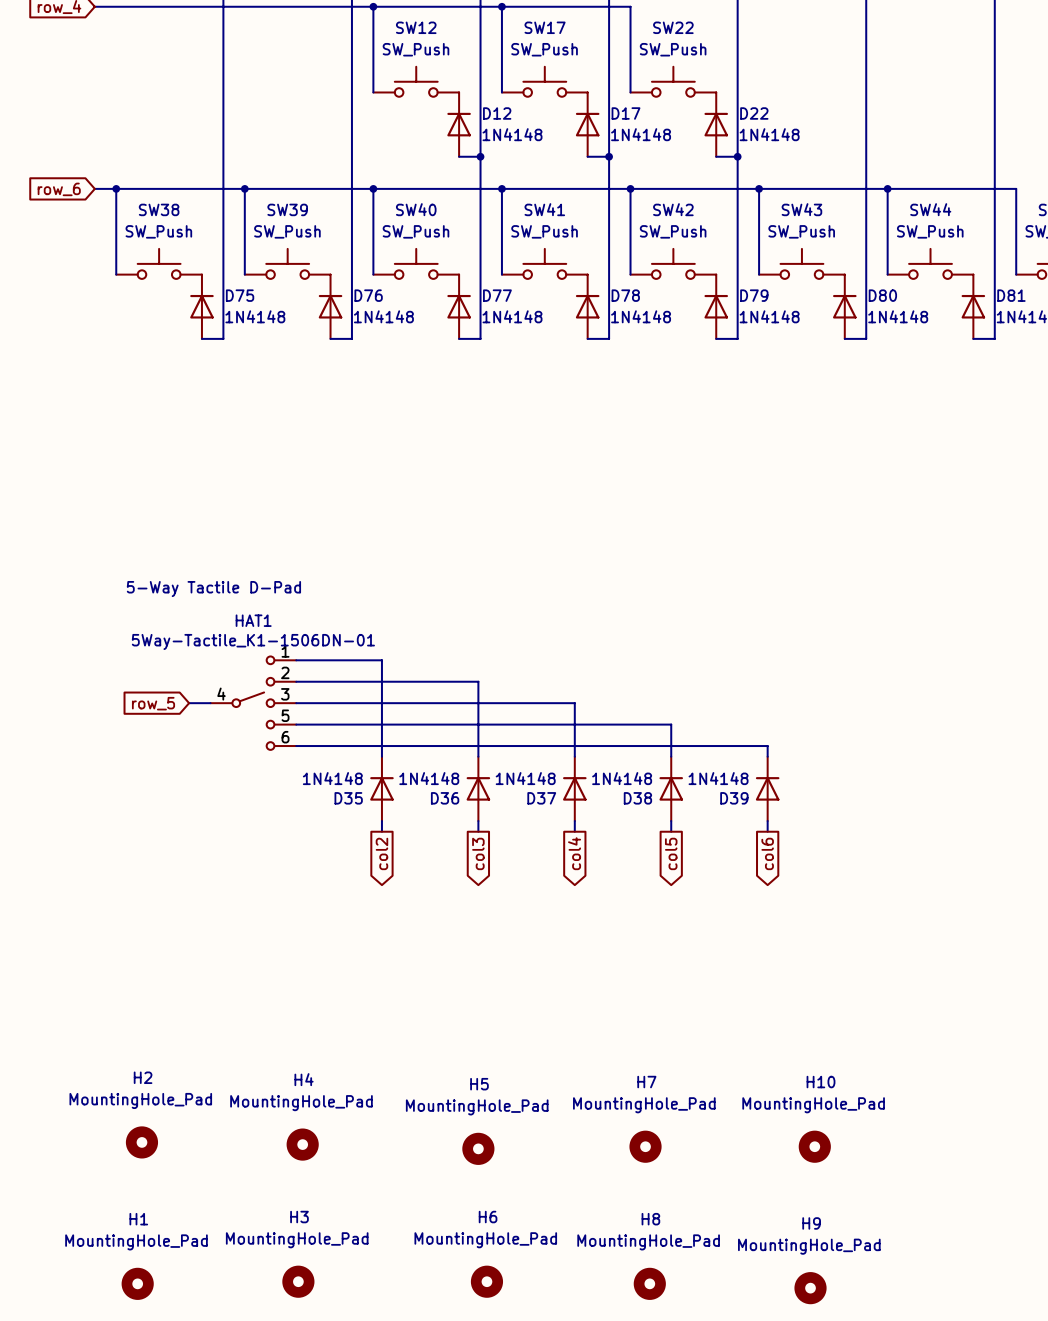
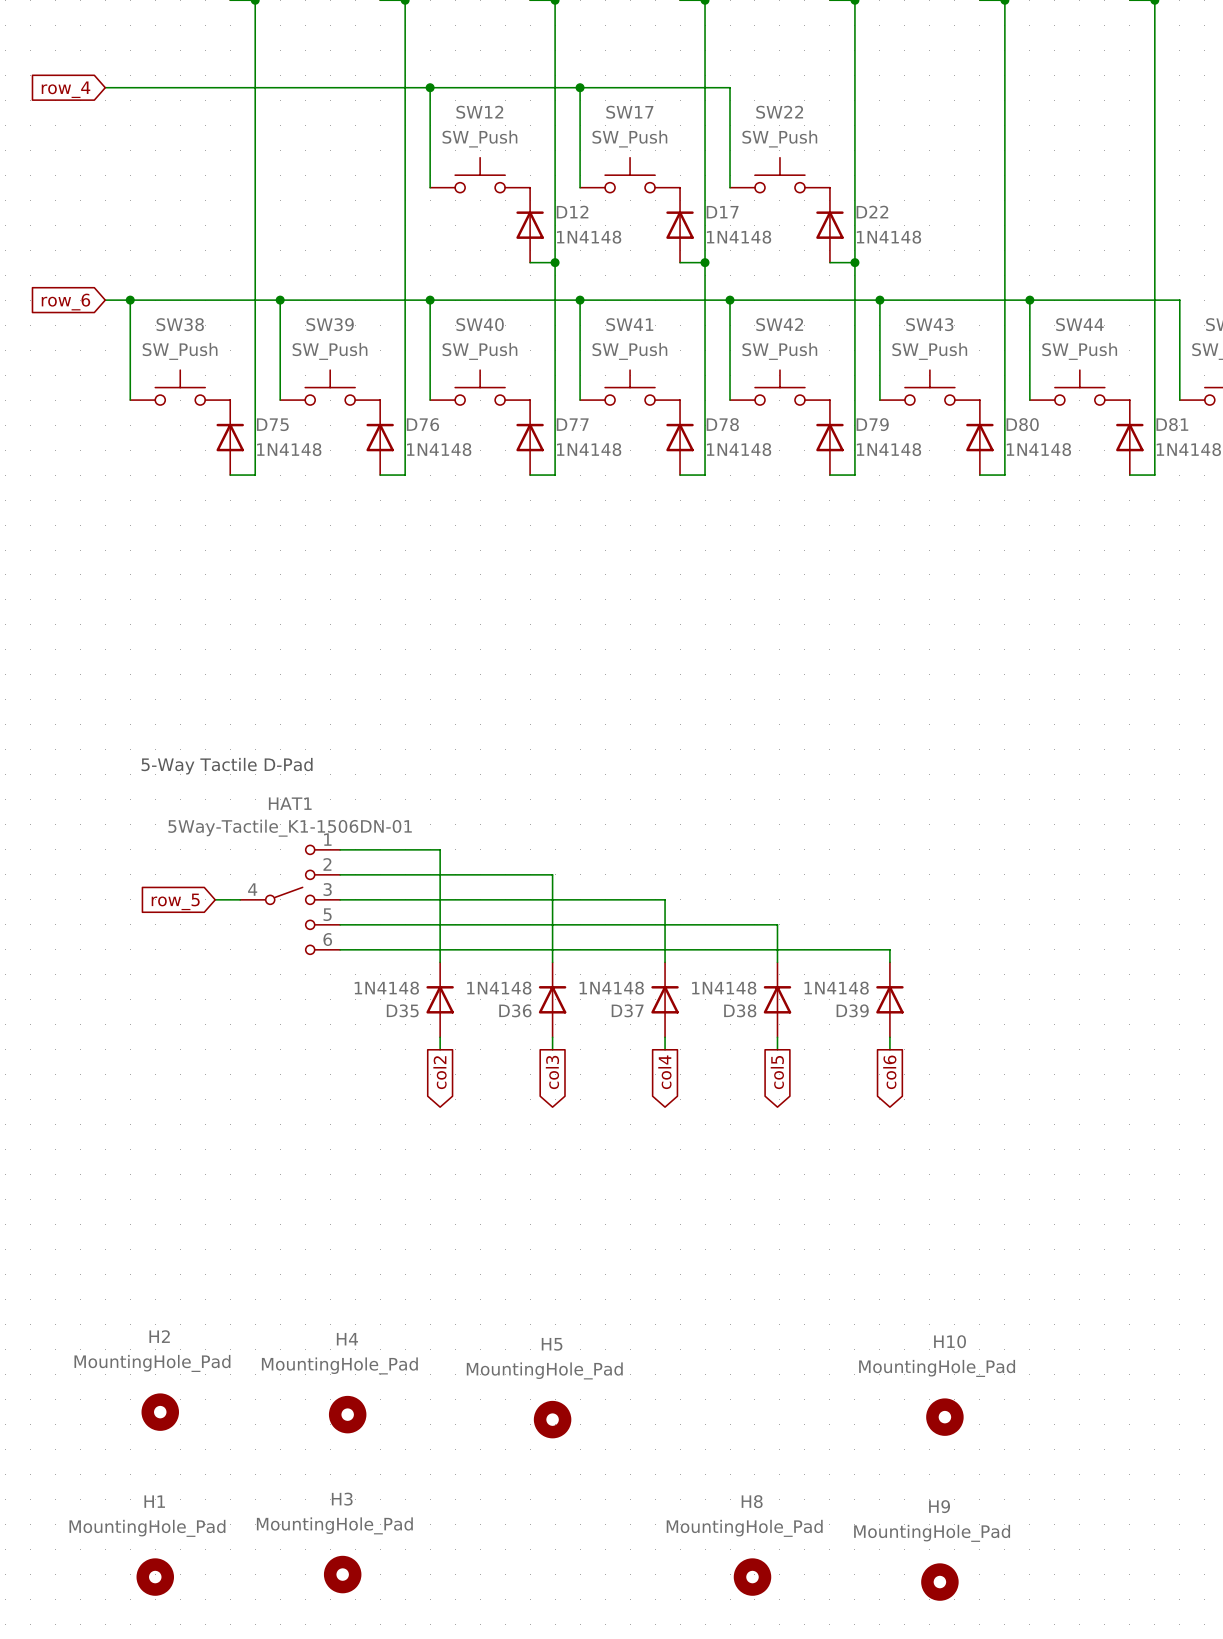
H7: MountingHole_Pad (645, 1146) -> none
H6: MountingHole_Pad (486, 1281) -> none

